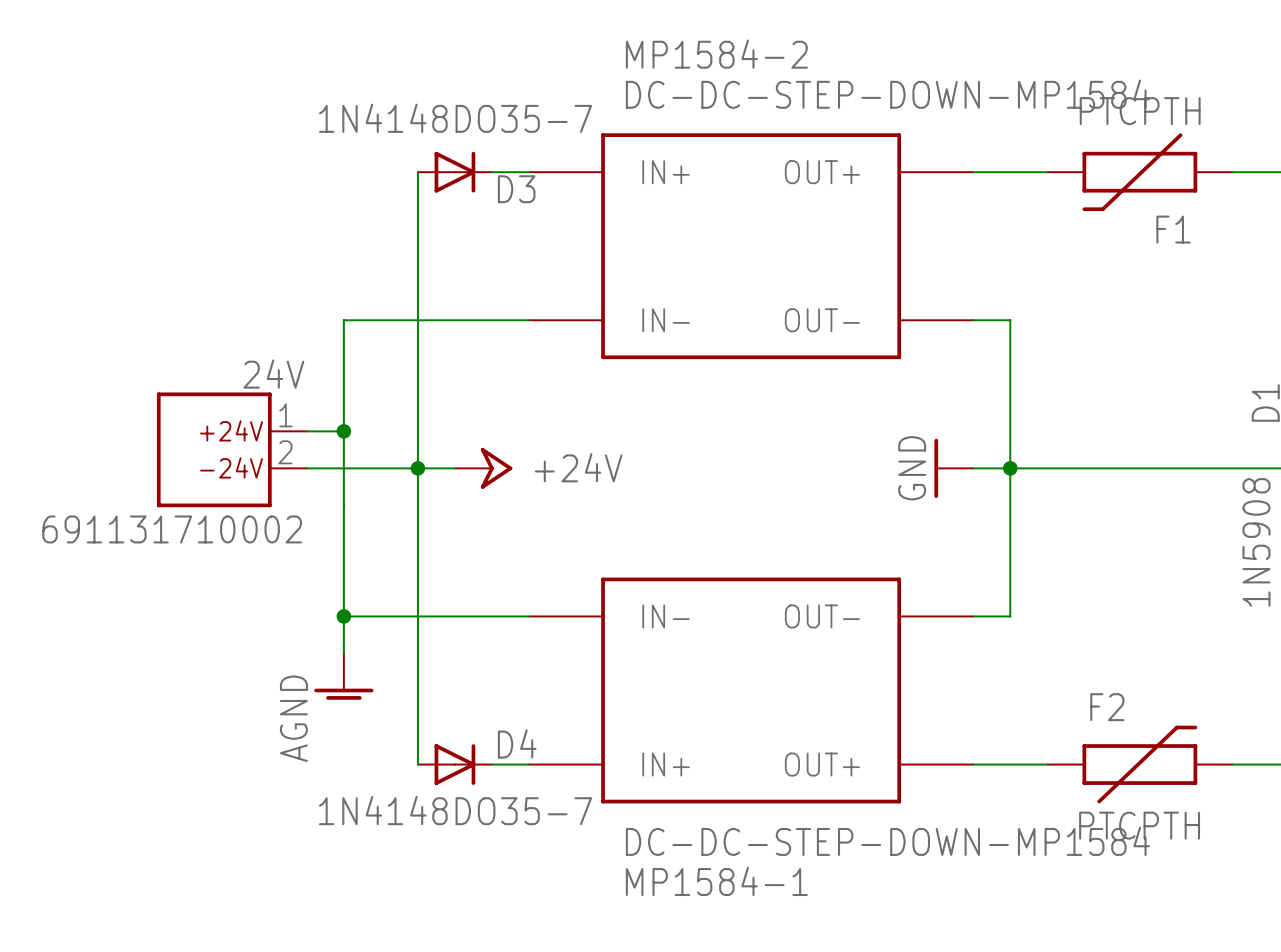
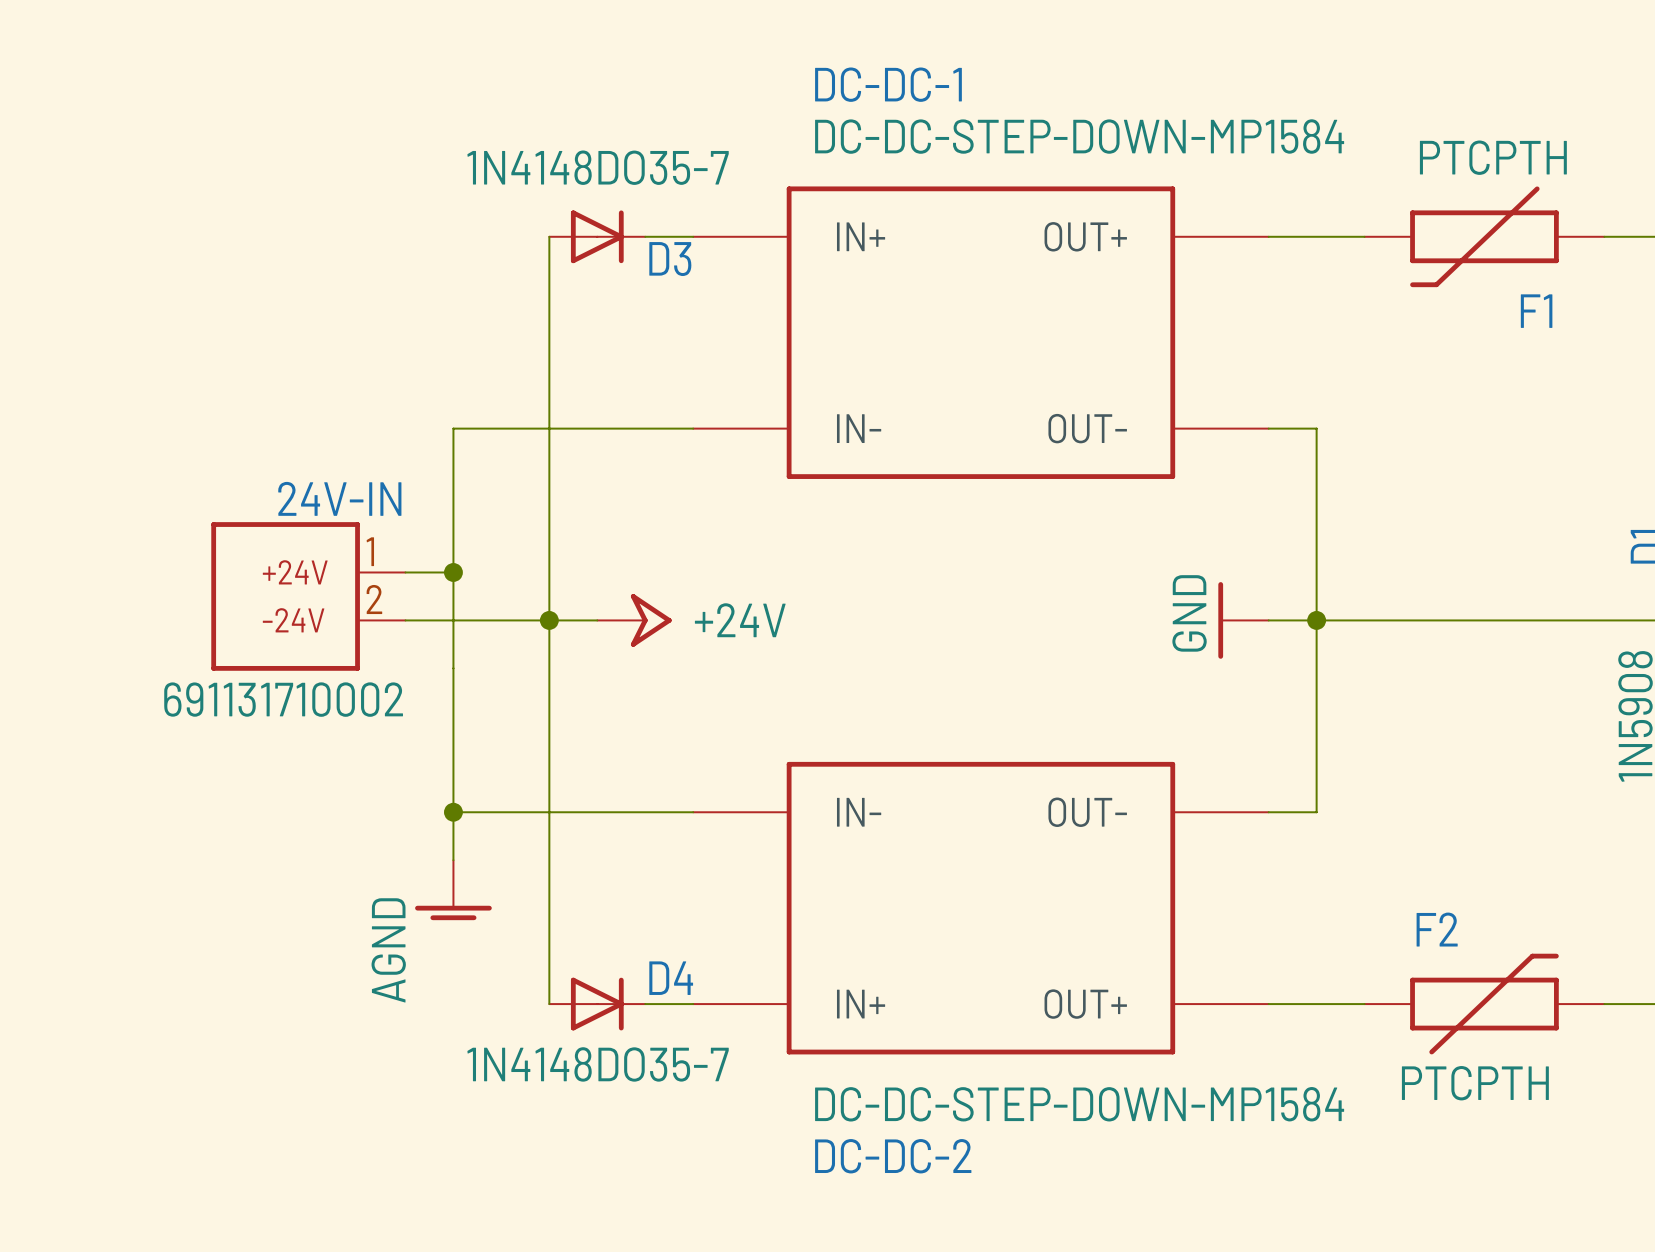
MP1584-2 name: MP1584-2 (716, 54) -> DC-DC-1 (888, 84)
24V name: 24V (273, 374) -> 24V-IN (339, 498)
MP1584-1 name: MP1584-1 (716, 881) -> DC-DC-2 (893, 1156)

